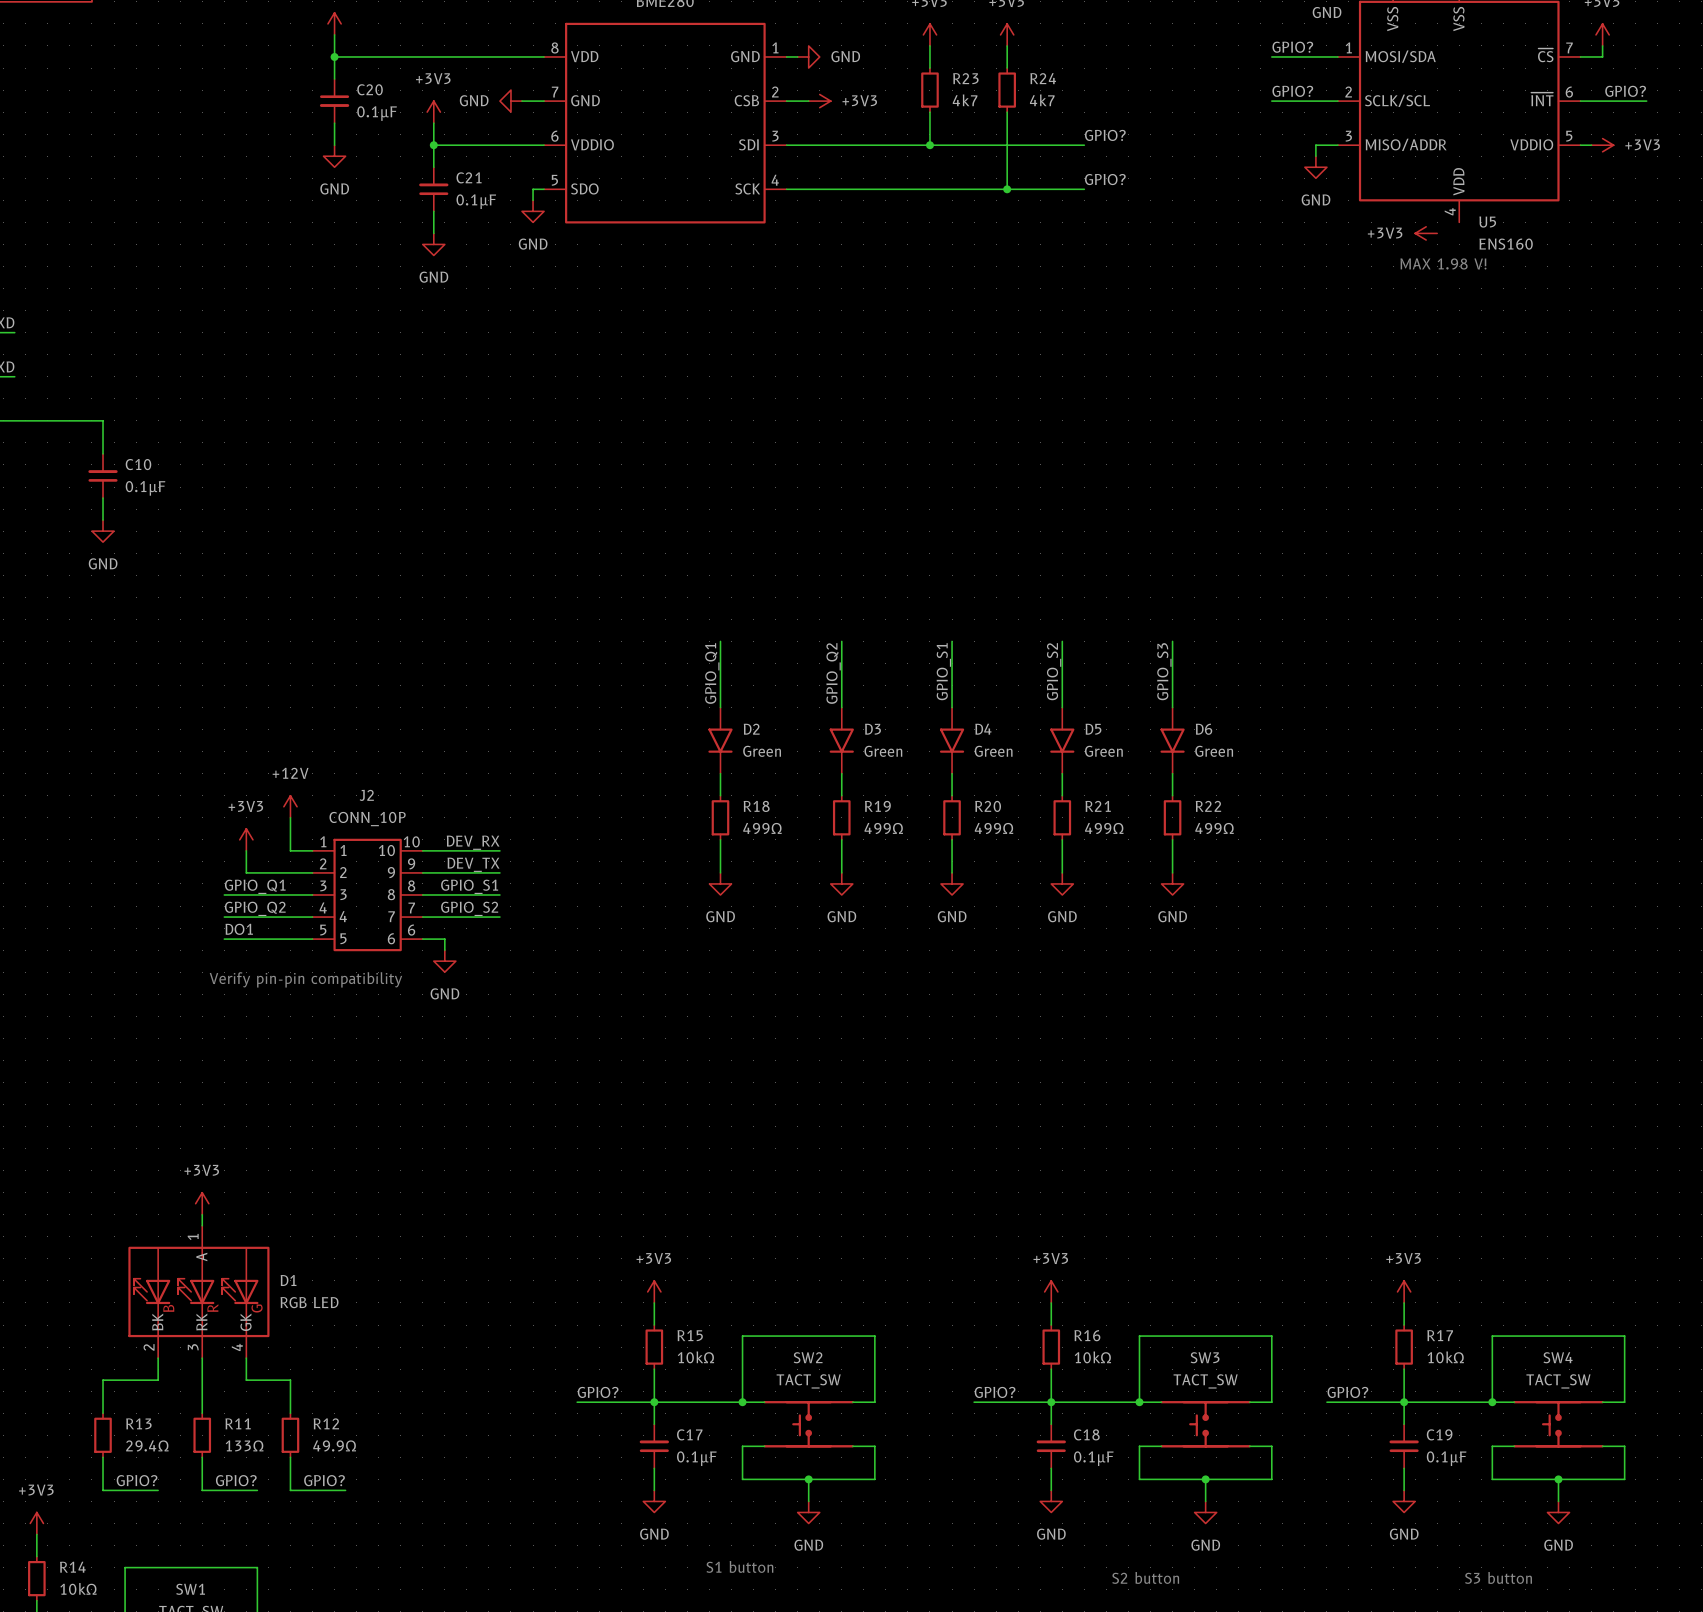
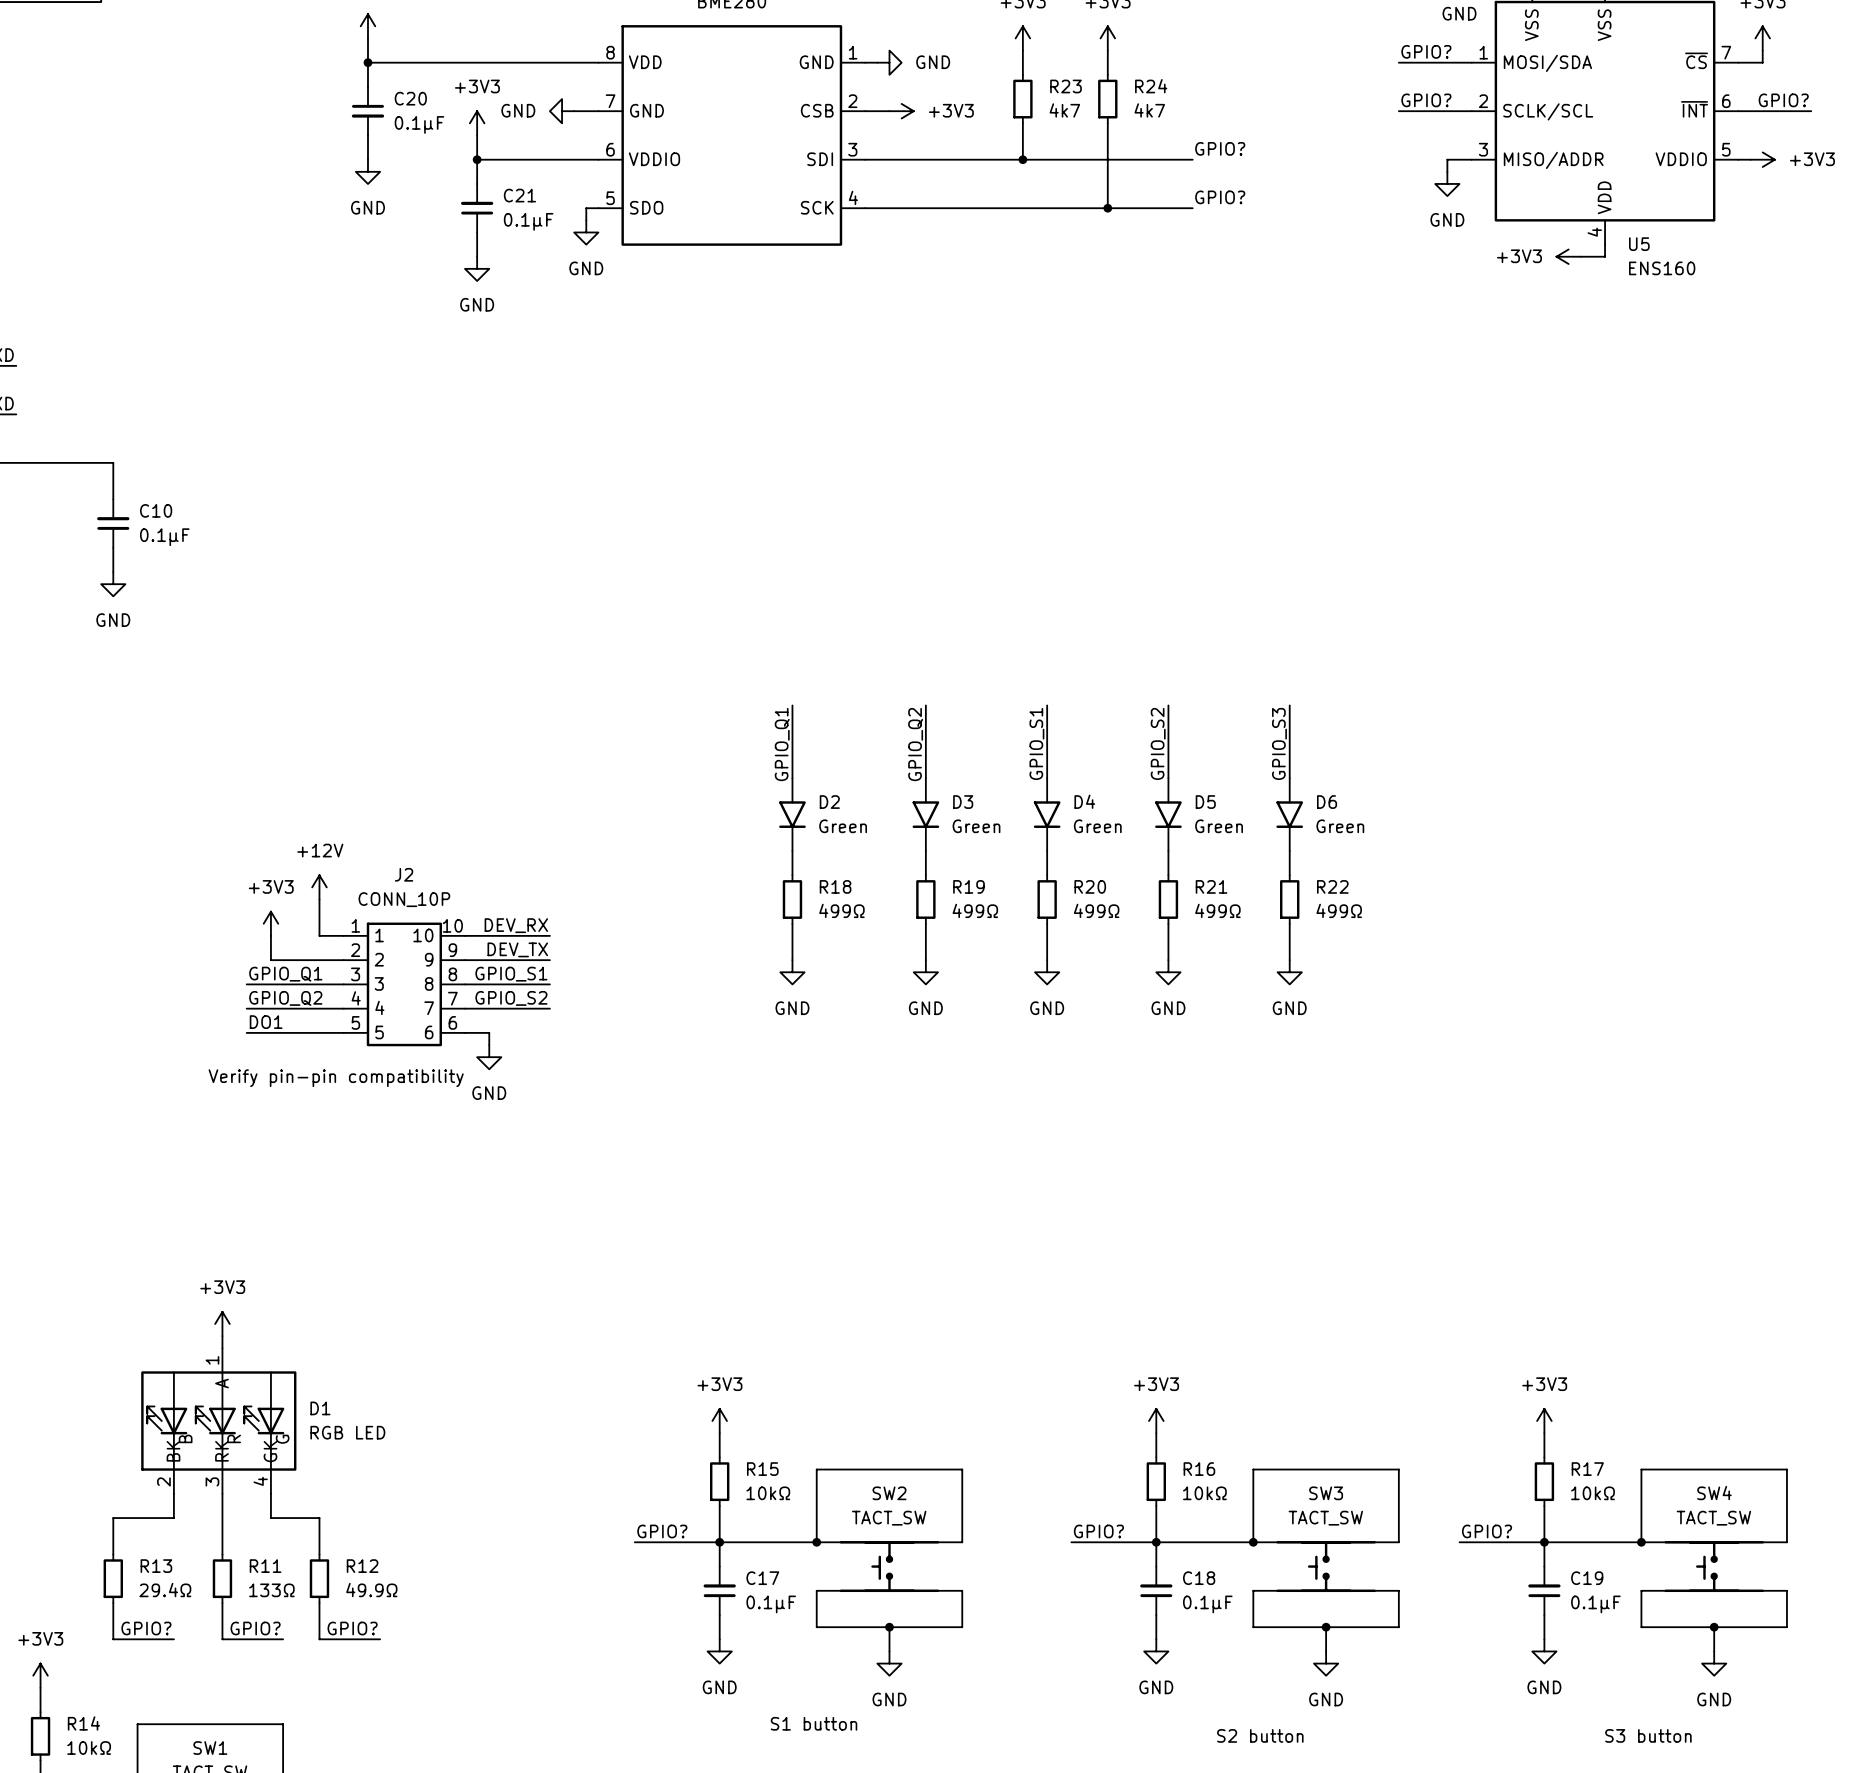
wire: none -> (1605, 244) (1605, 256) (1580, 256)
text: MAX 1.98 V! (1443, 263) -> none

